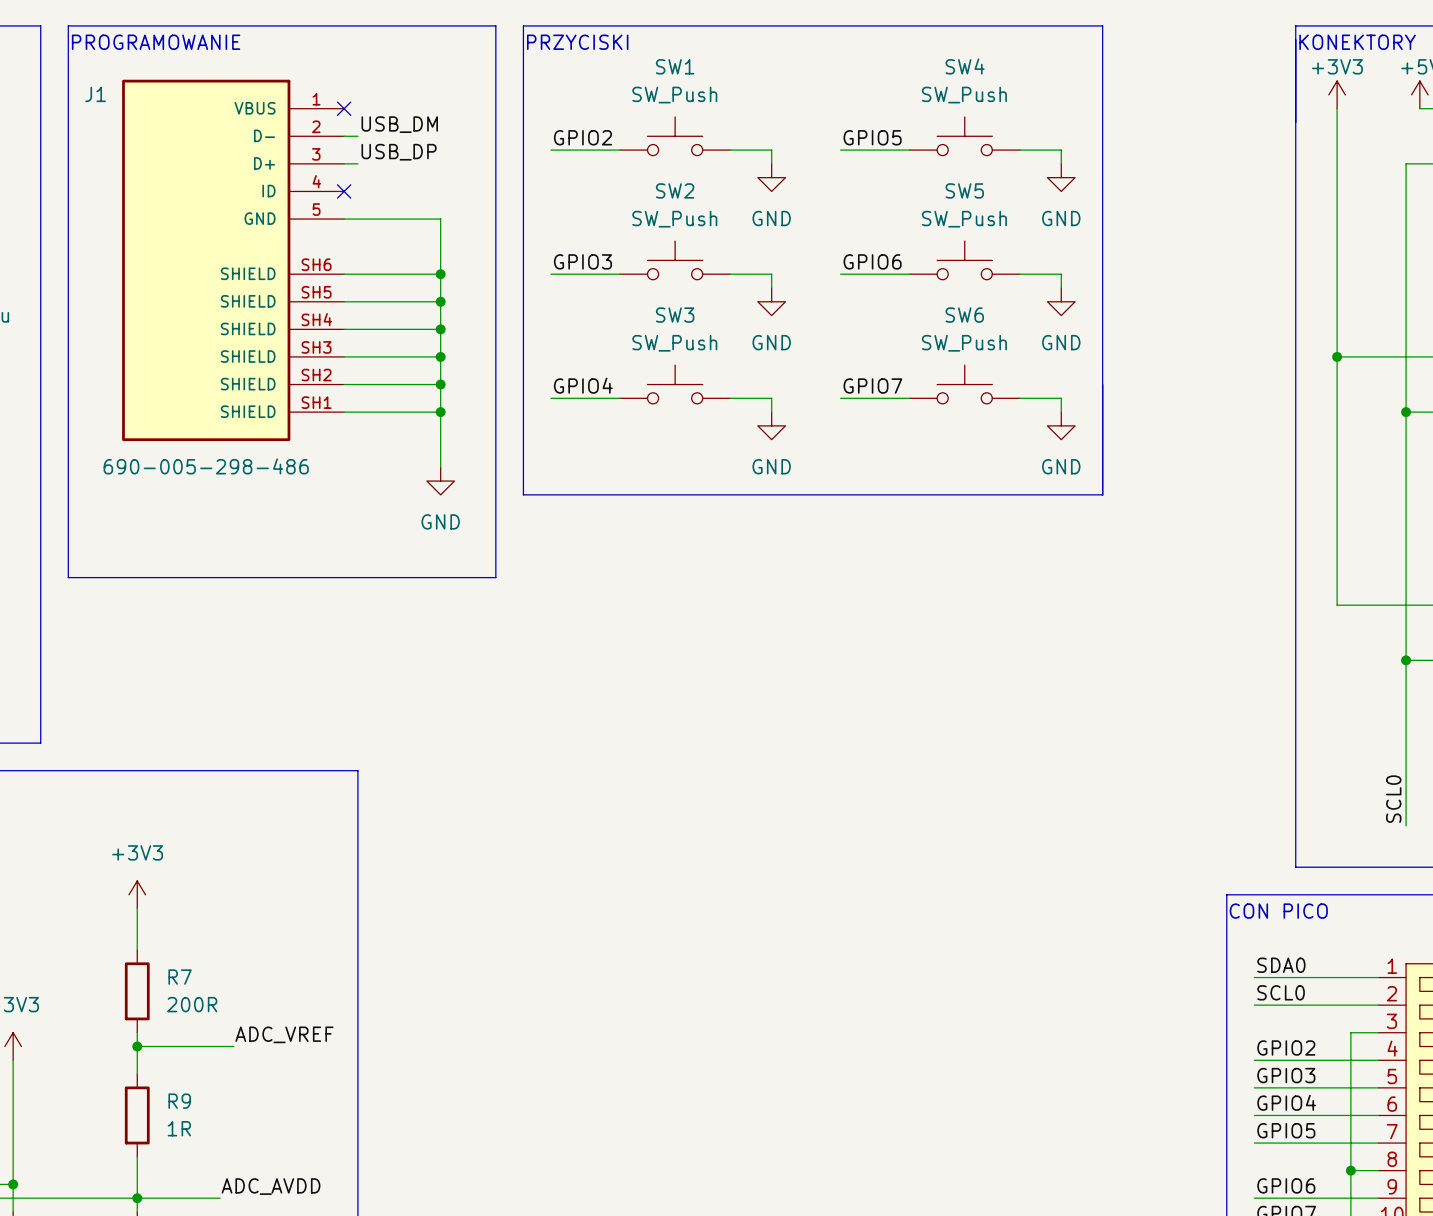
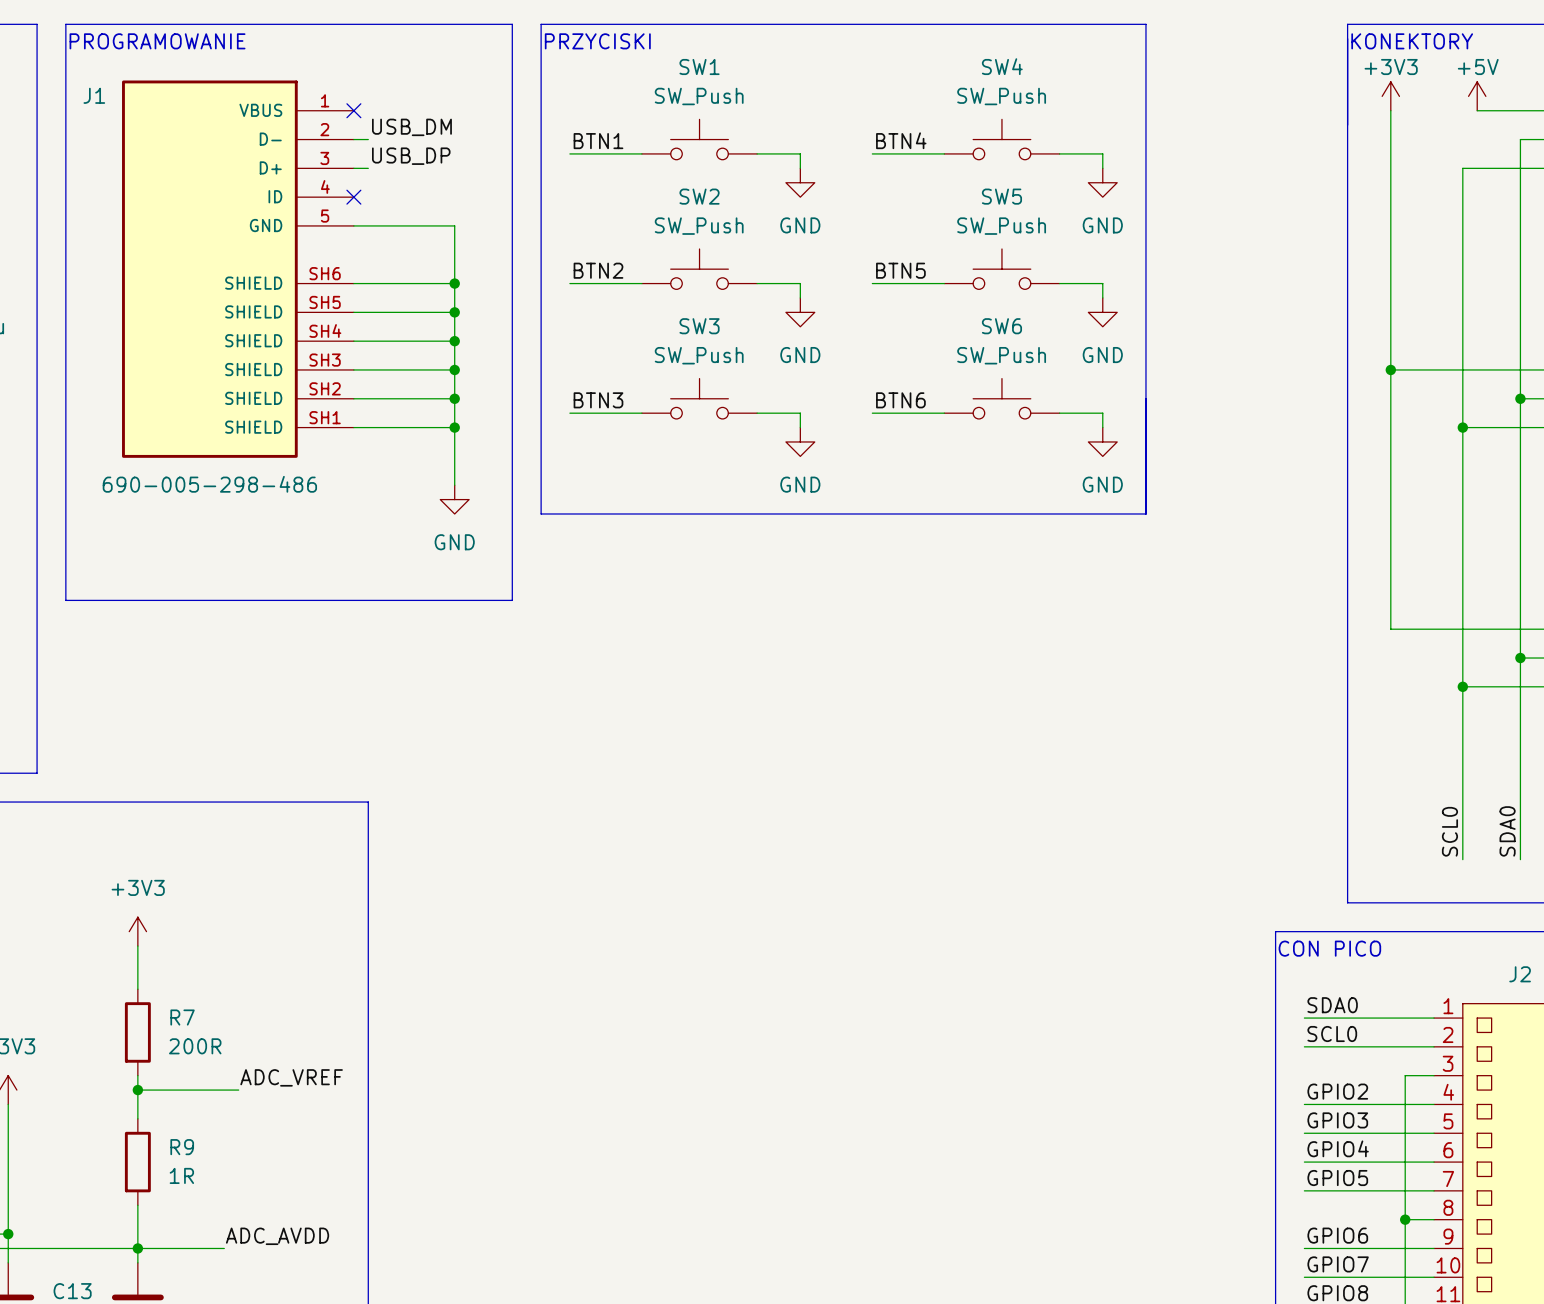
label: GPIO2 (582, 137) -> BTN1 (598, 141)
label: GPIO5 (872, 137) -> BTN4 (901, 140)
label: GPIO3 (582, 261) -> BTN2 (598, 270)
label: GPIO6 (872, 261) -> BTN5 (900, 270)
label: GPIO4 (583, 385) -> BTN3 (598, 400)
label: GPIO7 (872, 386) -> BTN6 (900, 400)

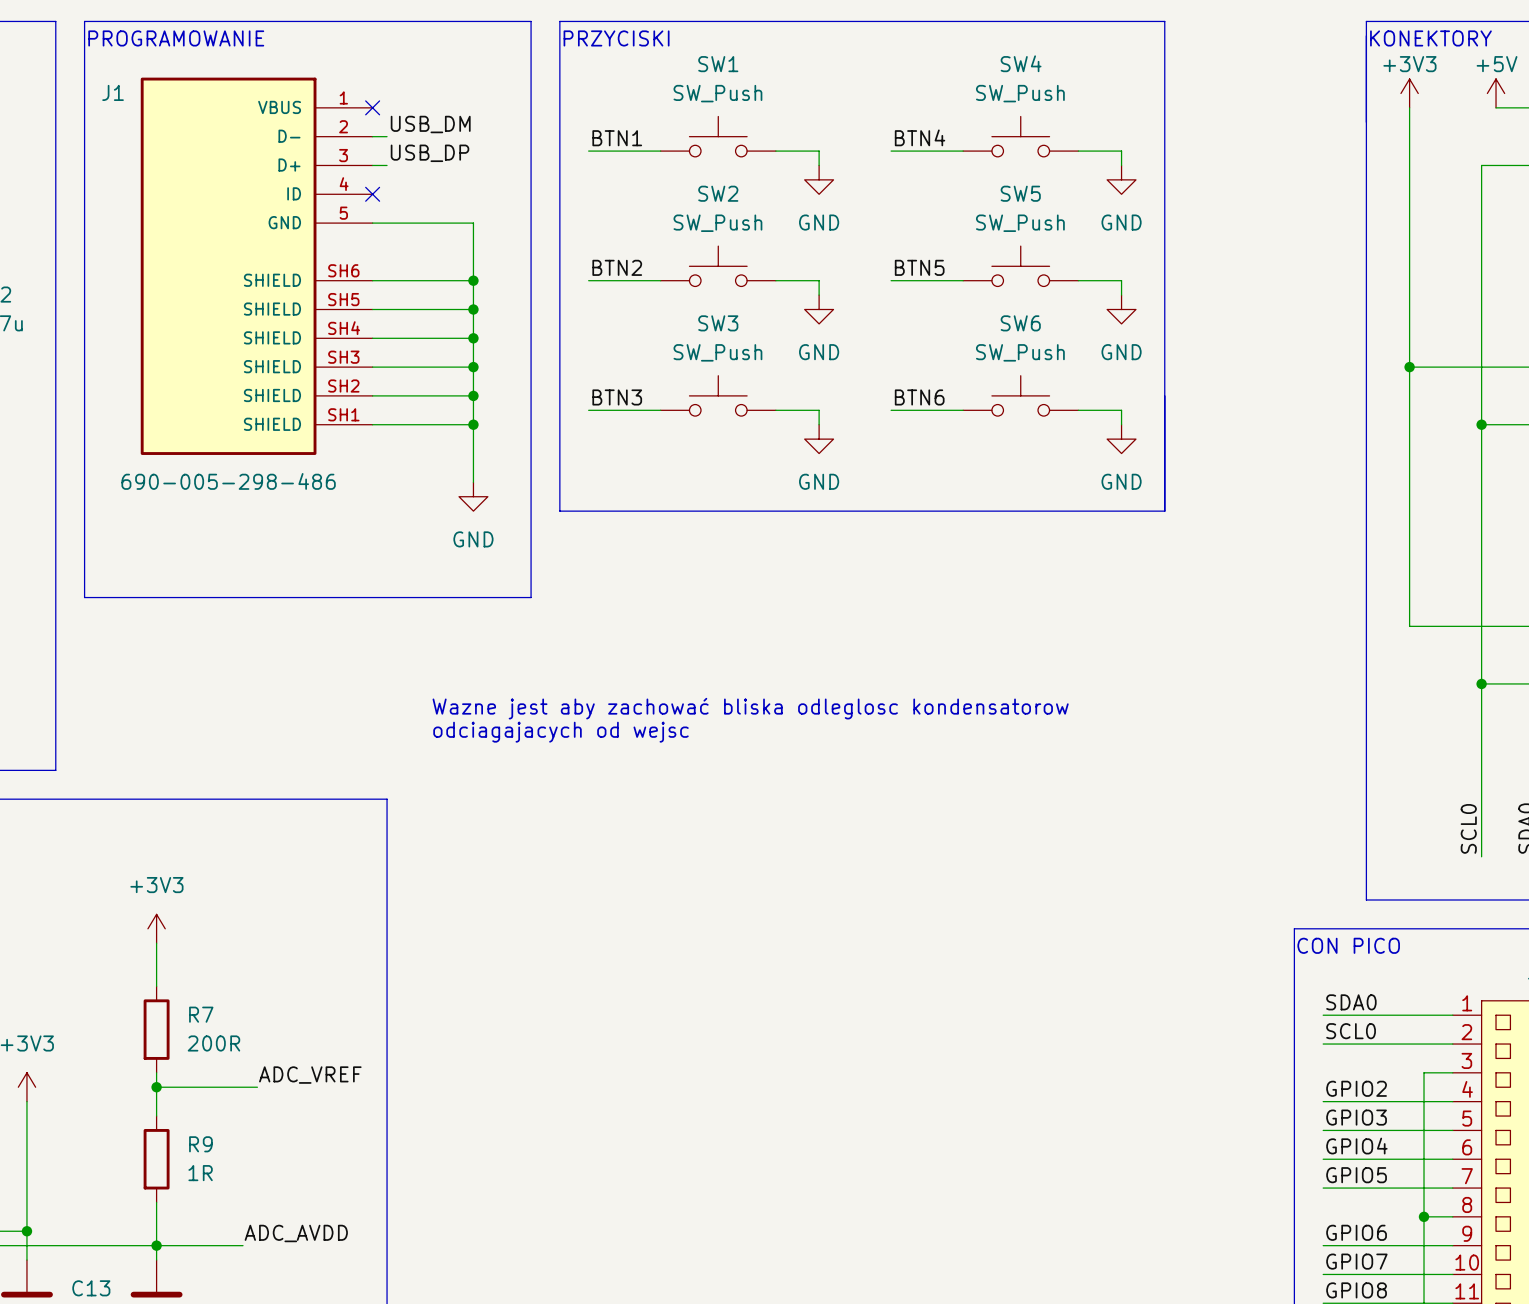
text: none -> Wazne jest aby zachować bliska odleglosc kondensatorow (750, 708)
text: none -> odciagajacych od wejsc (561, 732)

